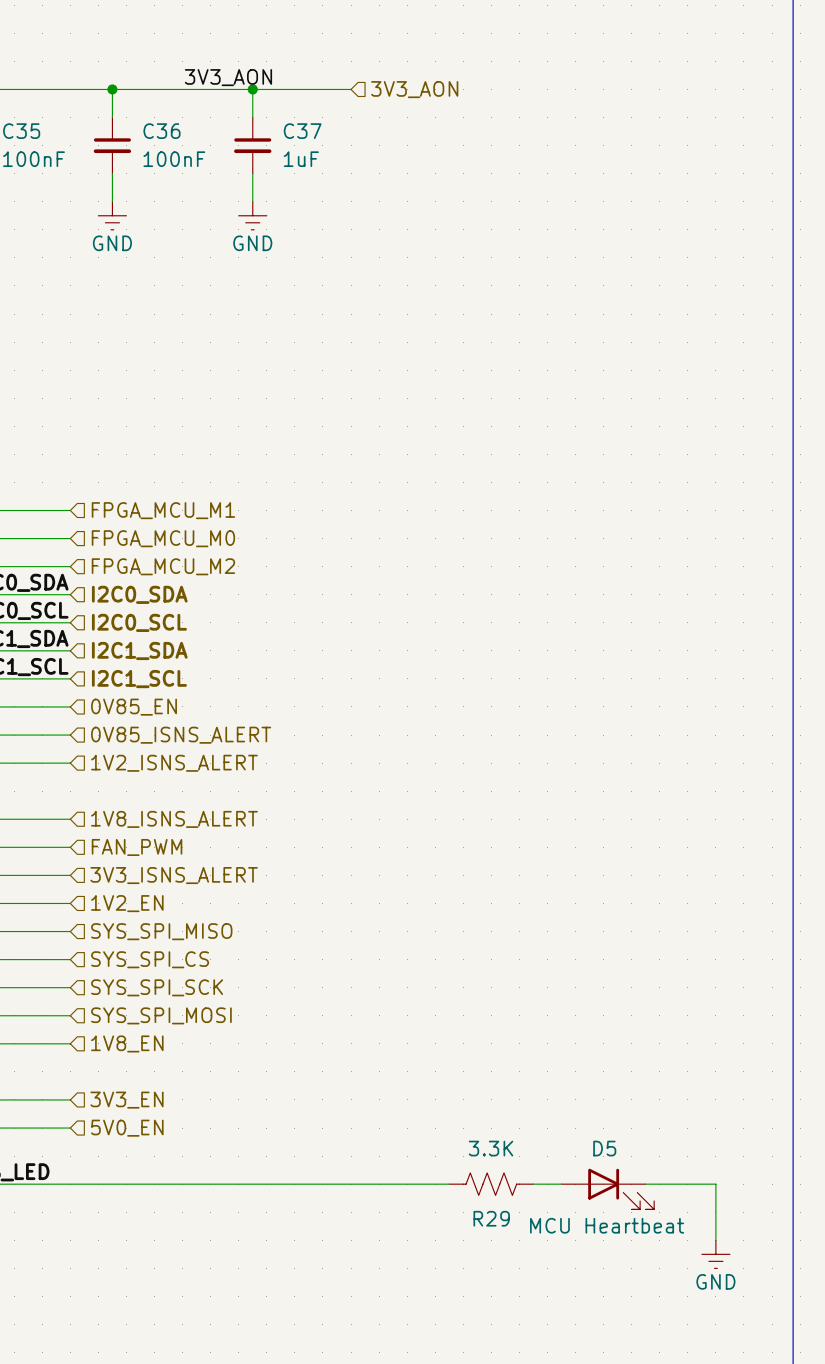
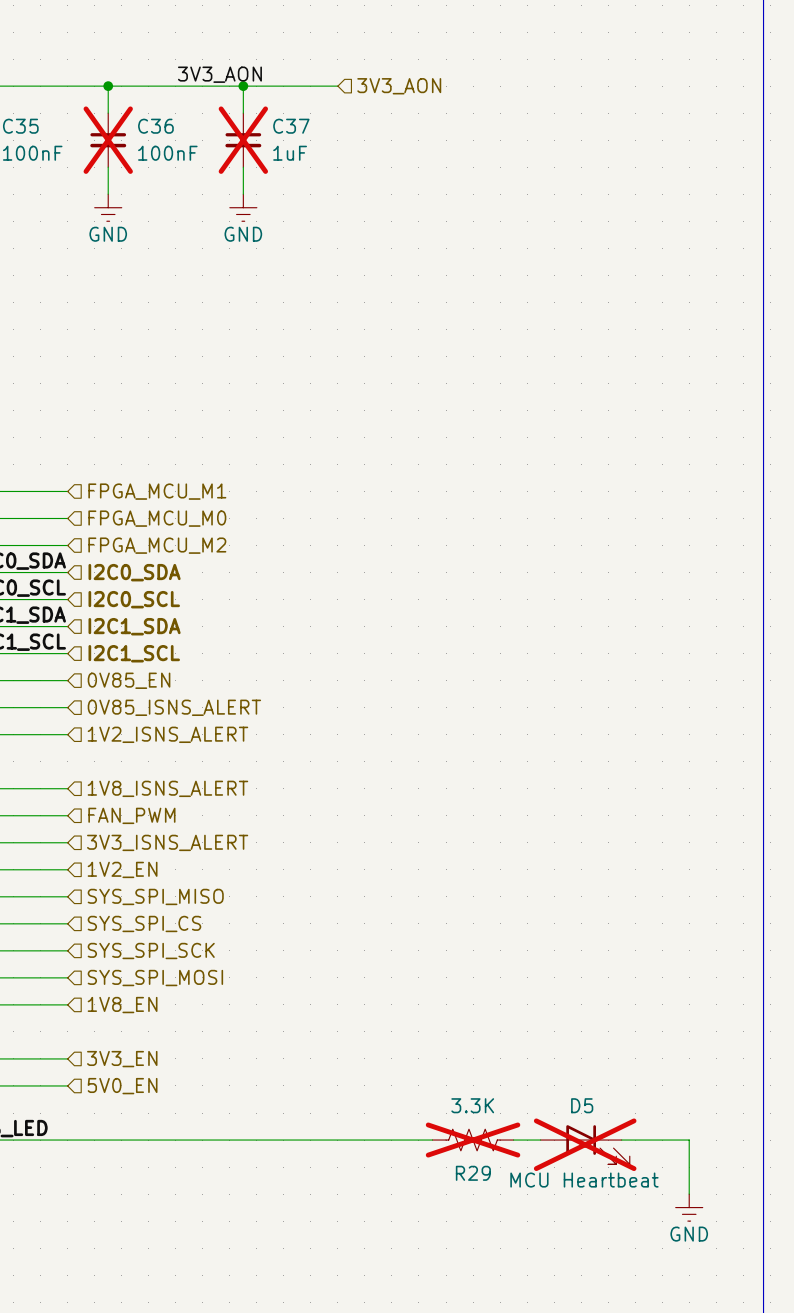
C36 do-not-place cross: none -> (108, 140)
C37 do-not-place cross: none -> (243, 140)
R29 do-not-place cross: none -> (473, 1140)
D5 do-not-place cross: none -> (585, 1144)

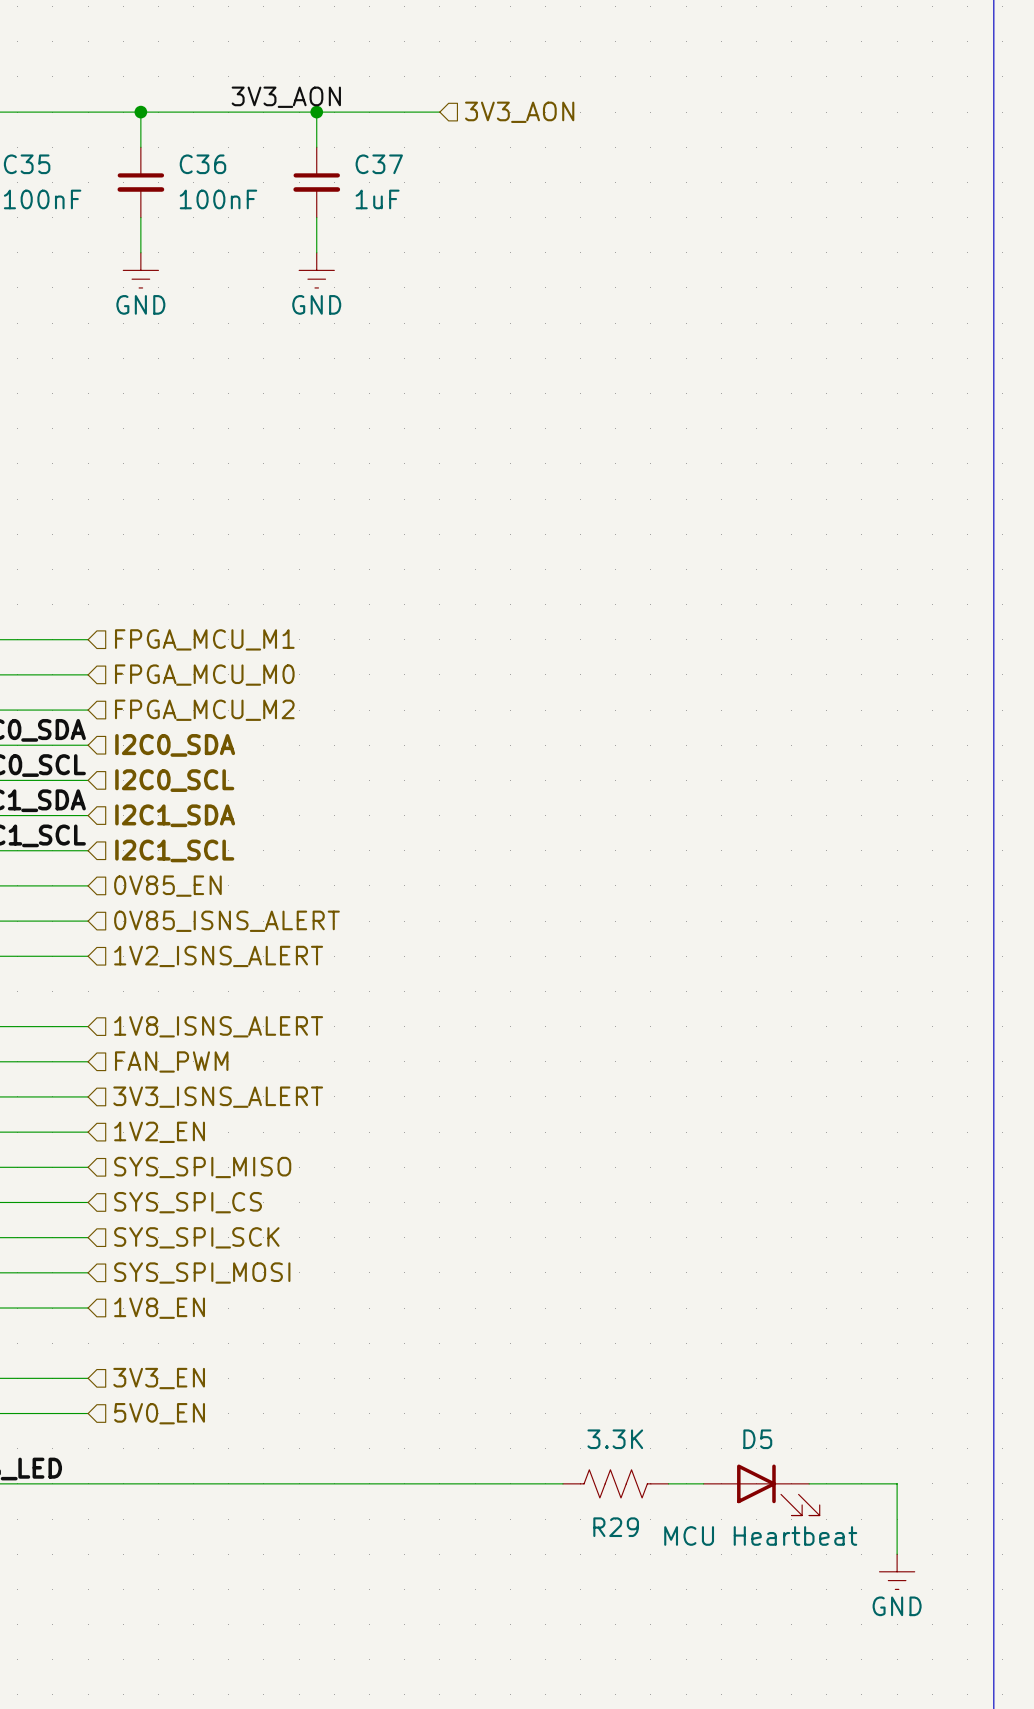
C36 do-not-place cross: (108, 140) -> none
C37 do-not-place cross: (243, 140) -> none
R29 do-not-place cross: (473, 1140) -> none
D5 do-not-place cross: (585, 1144) -> none

